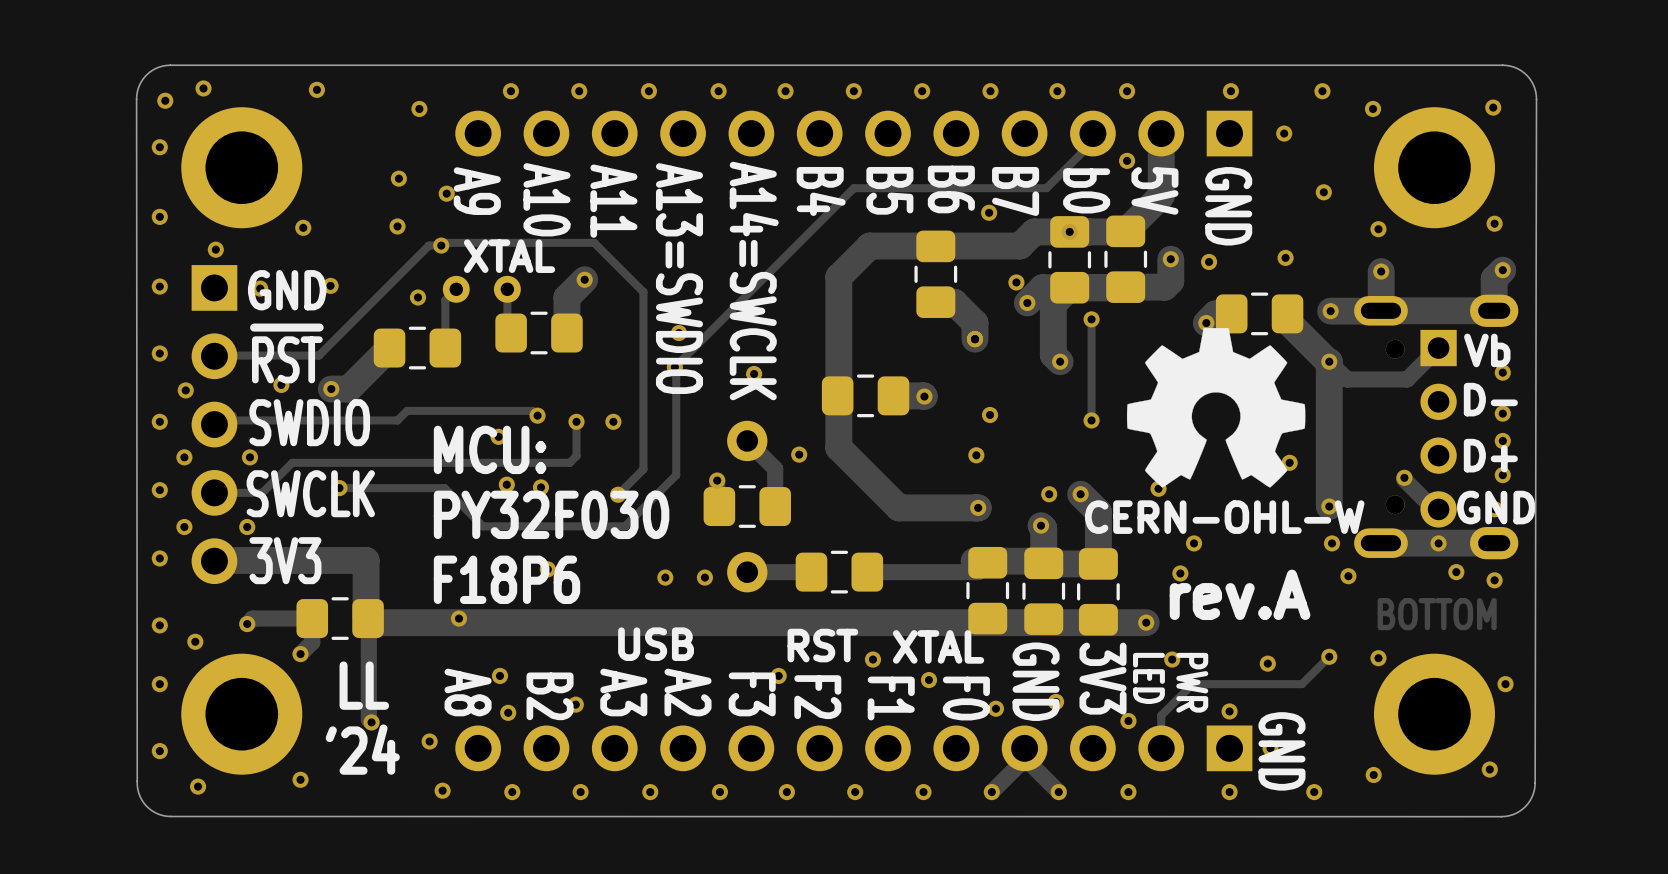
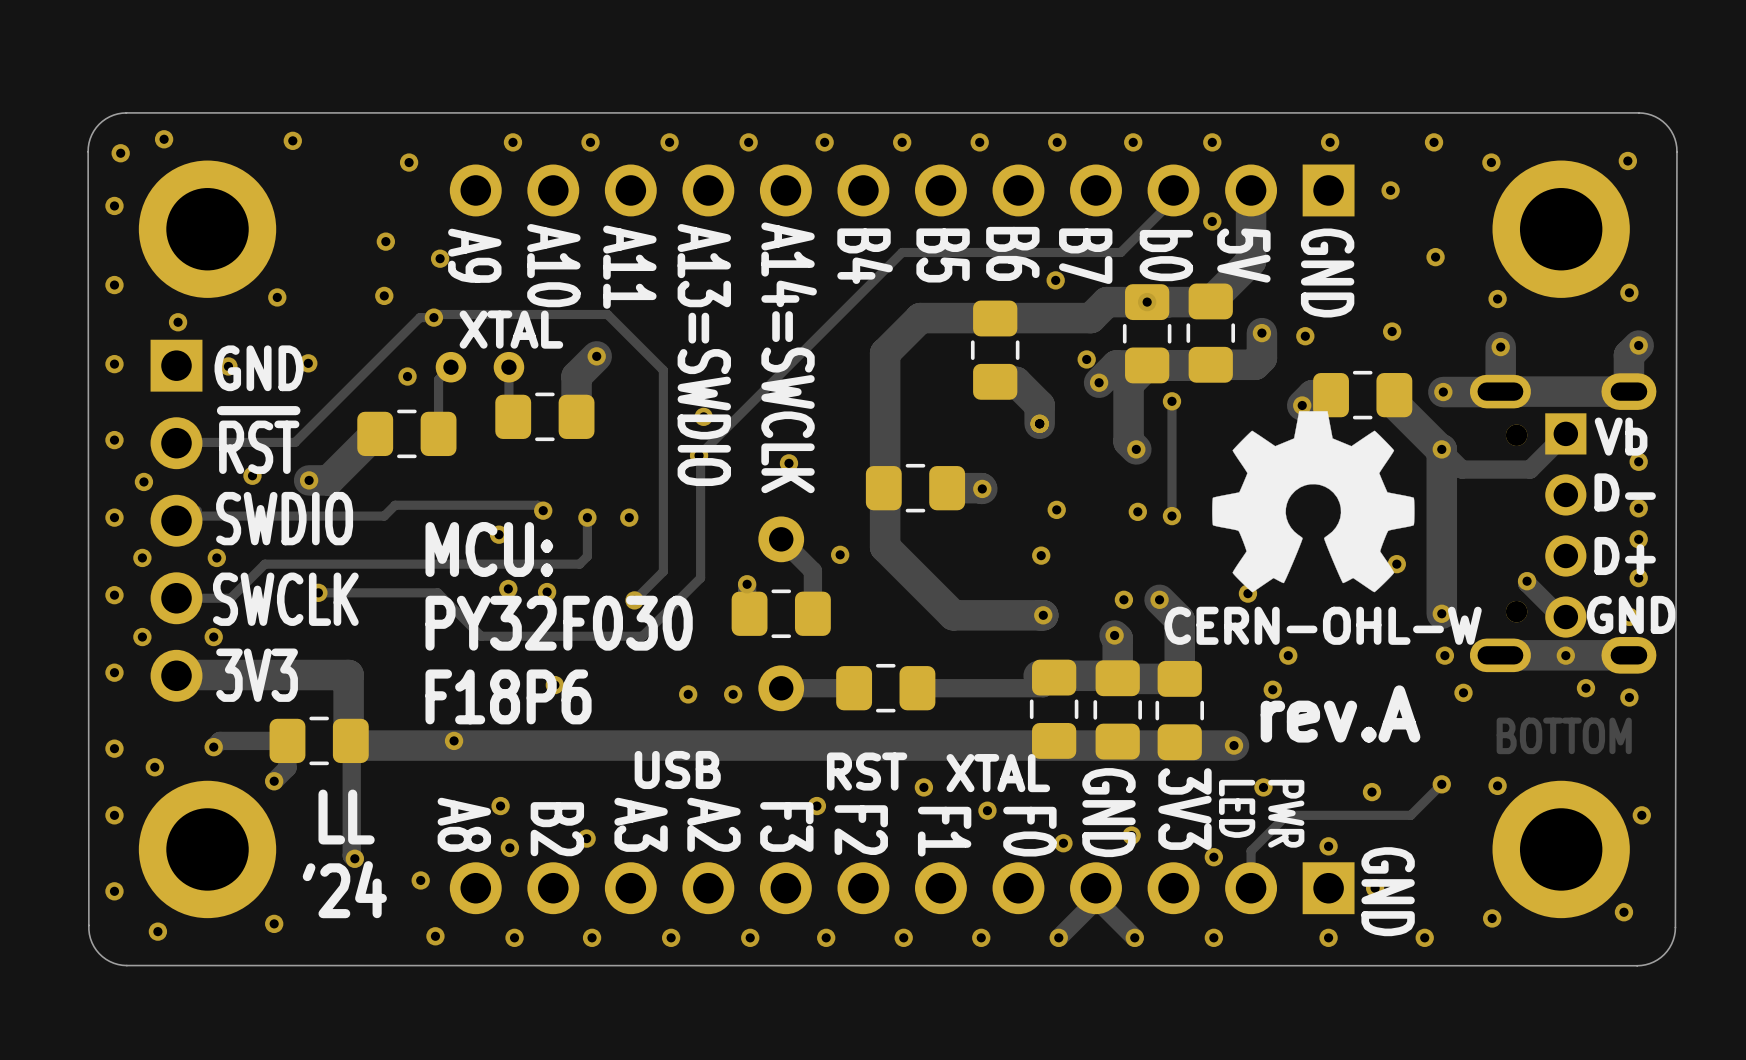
via: none -> (1137, 511)

